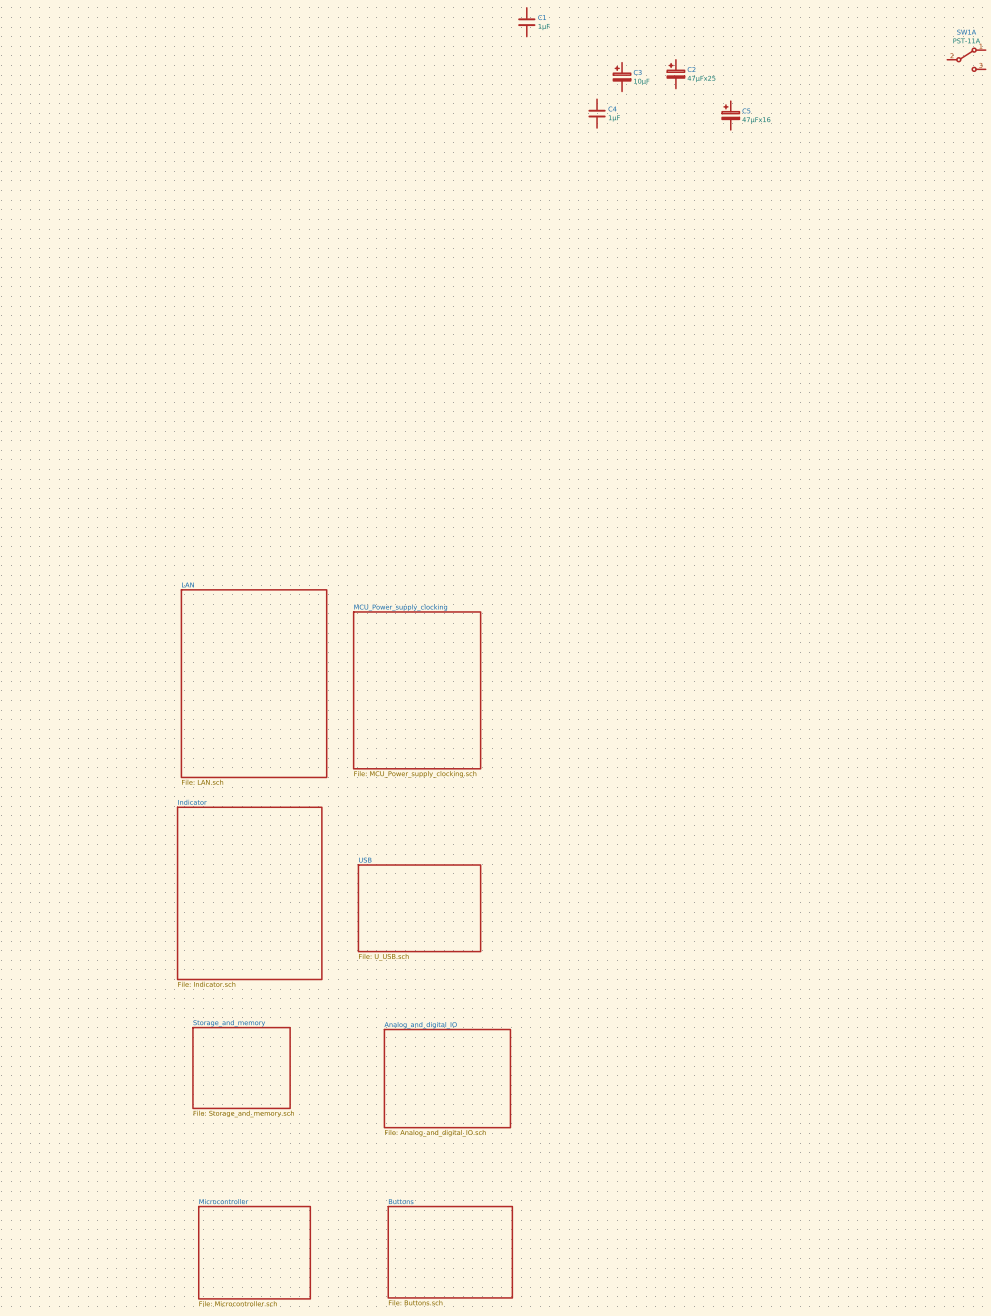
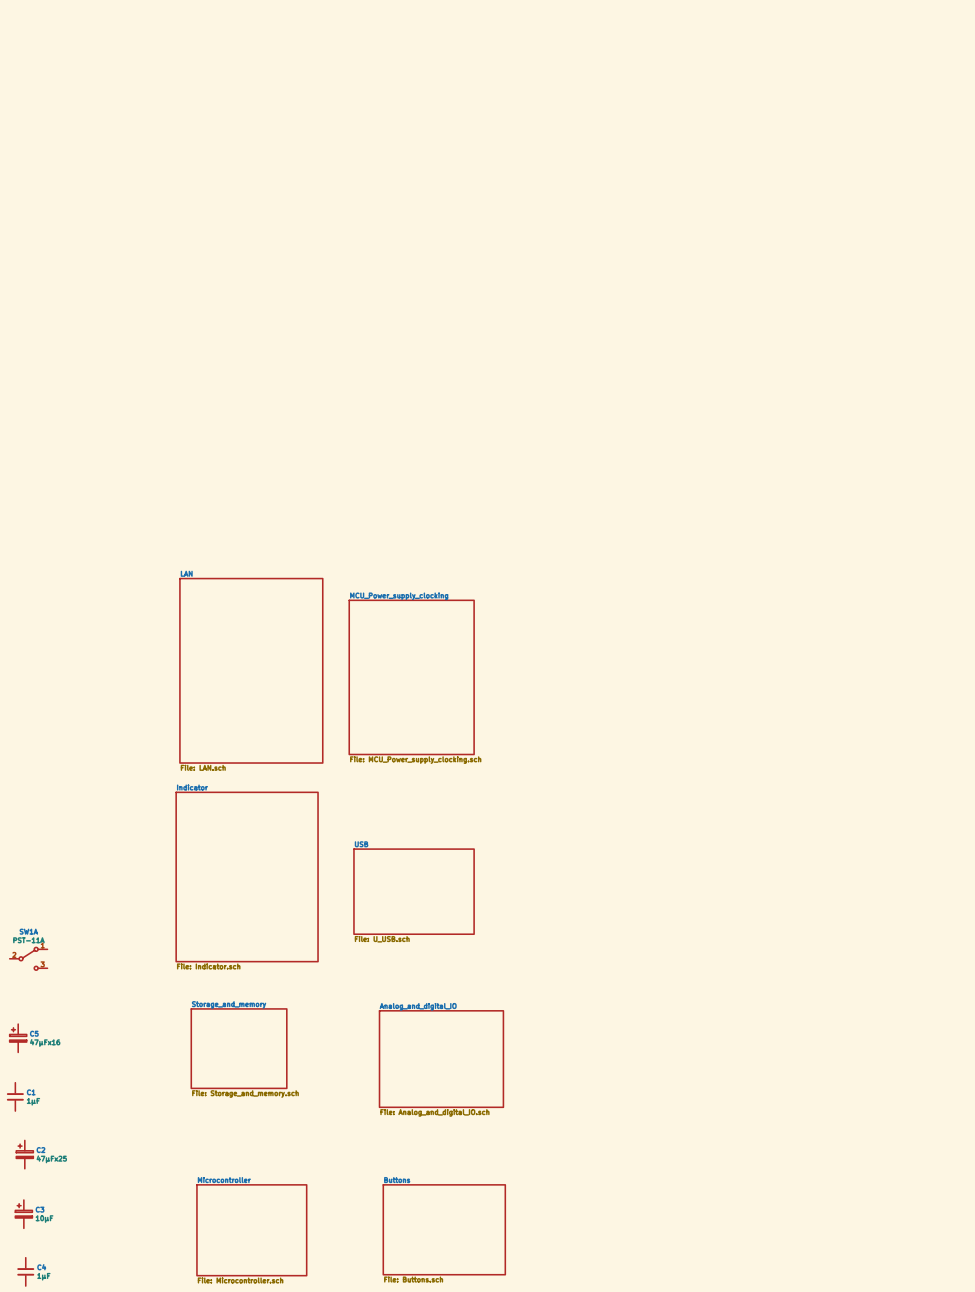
part position: (526, 22) -> (15, 1096)
part position: (966, 59) -> (28, 958)
part position: (675, 74) -> (24, 1154)
part position: (622, 77) -> (23, 1214)
part position: (597, 113) -> (25, 1271)
part position: (730, 115) -> (18, 1038)

